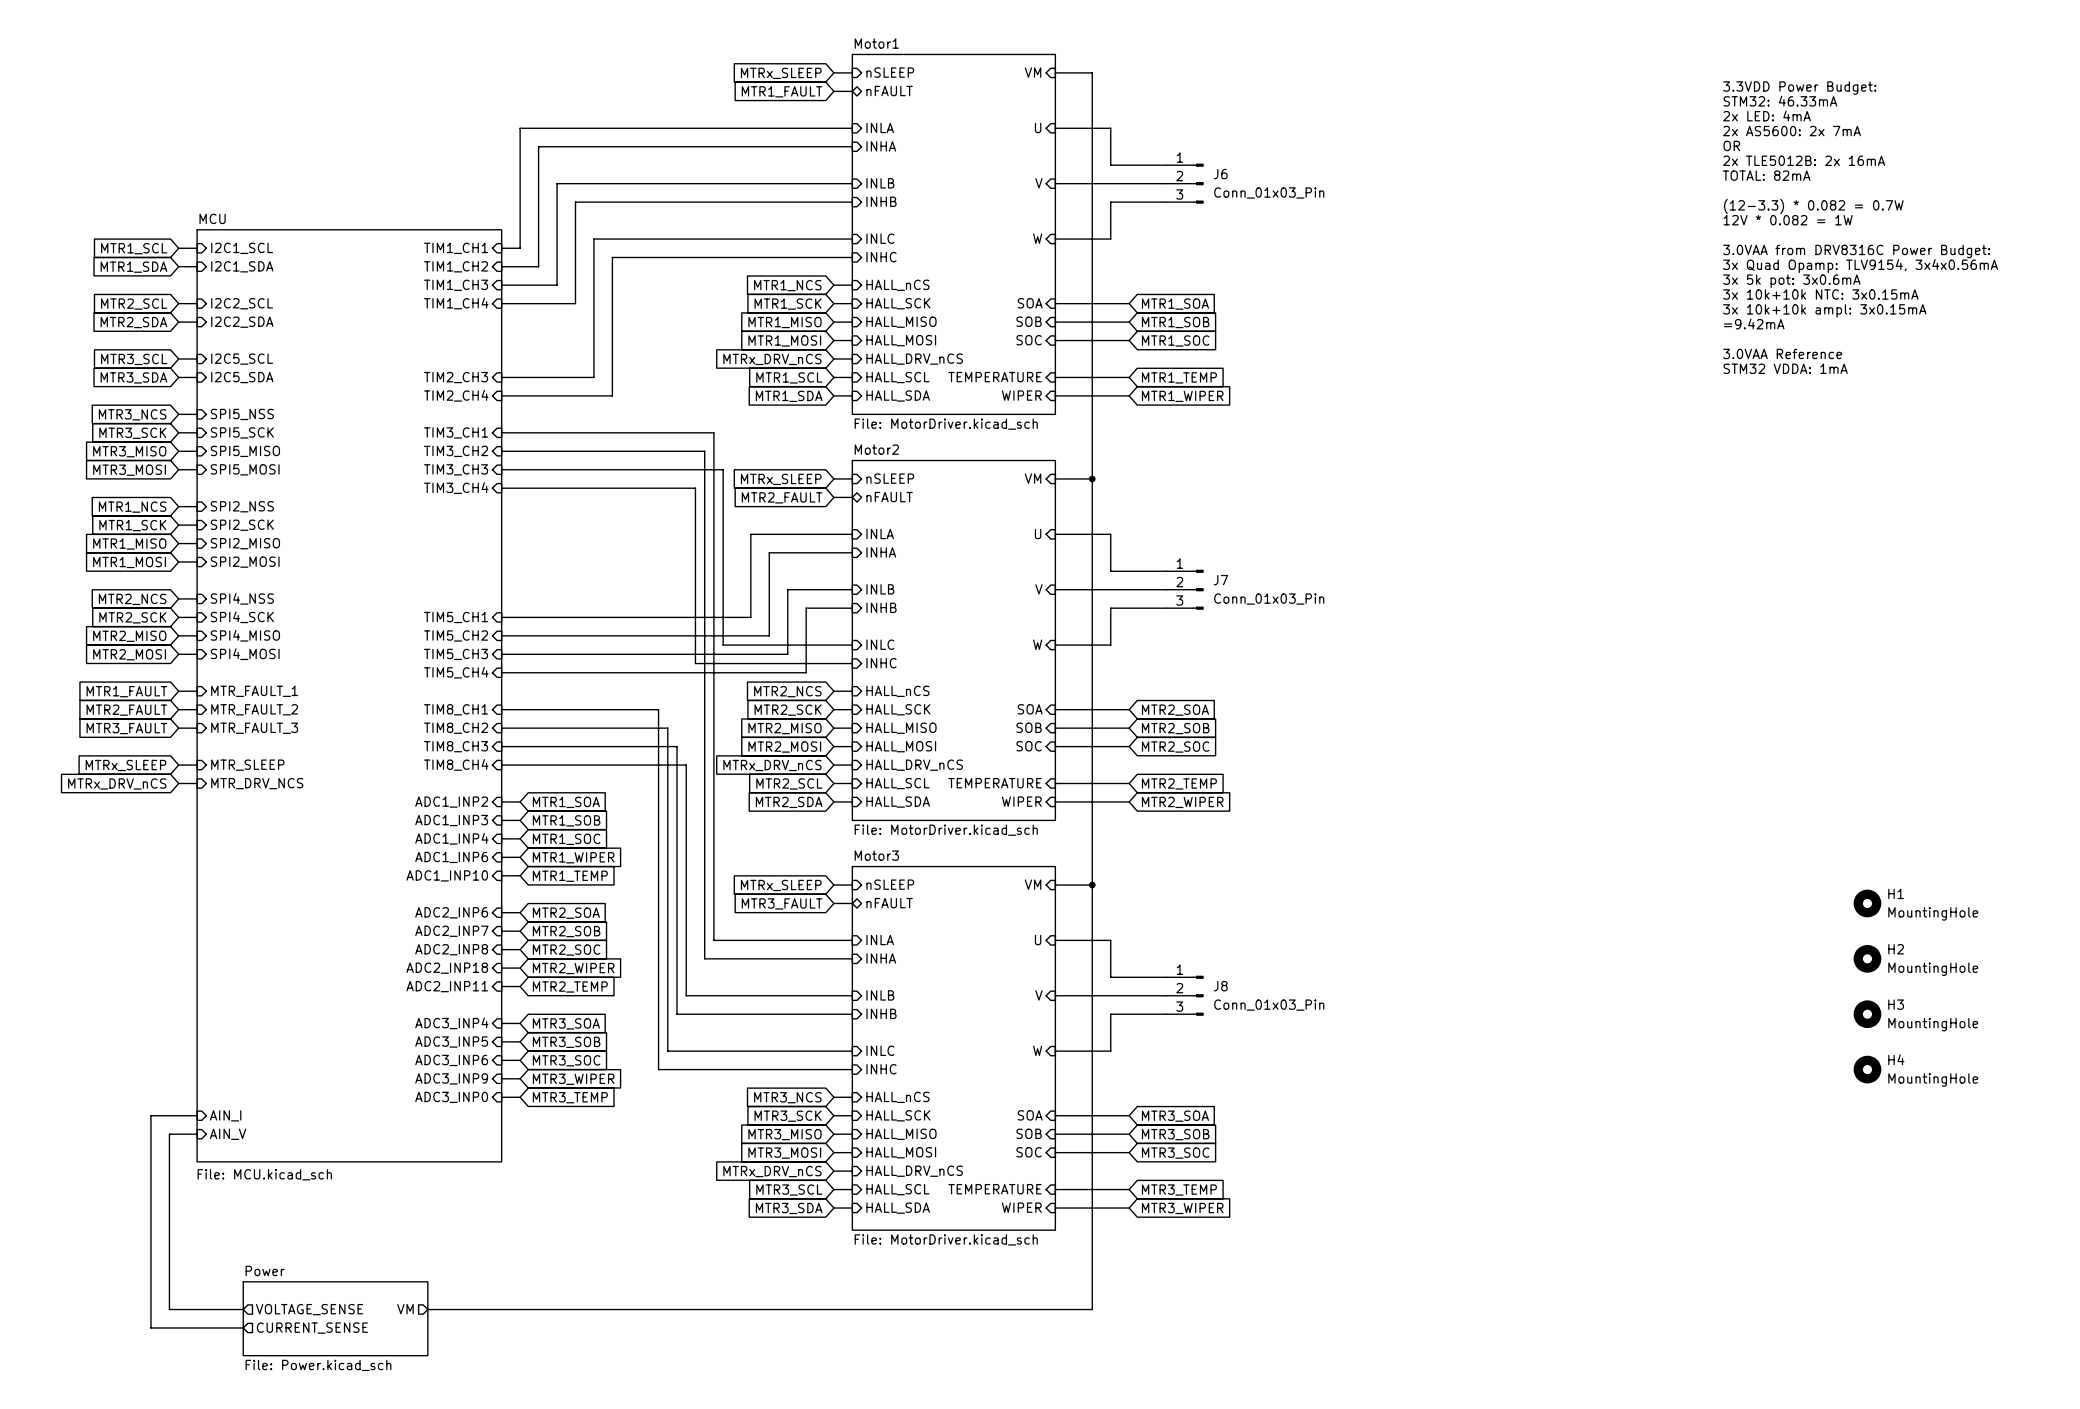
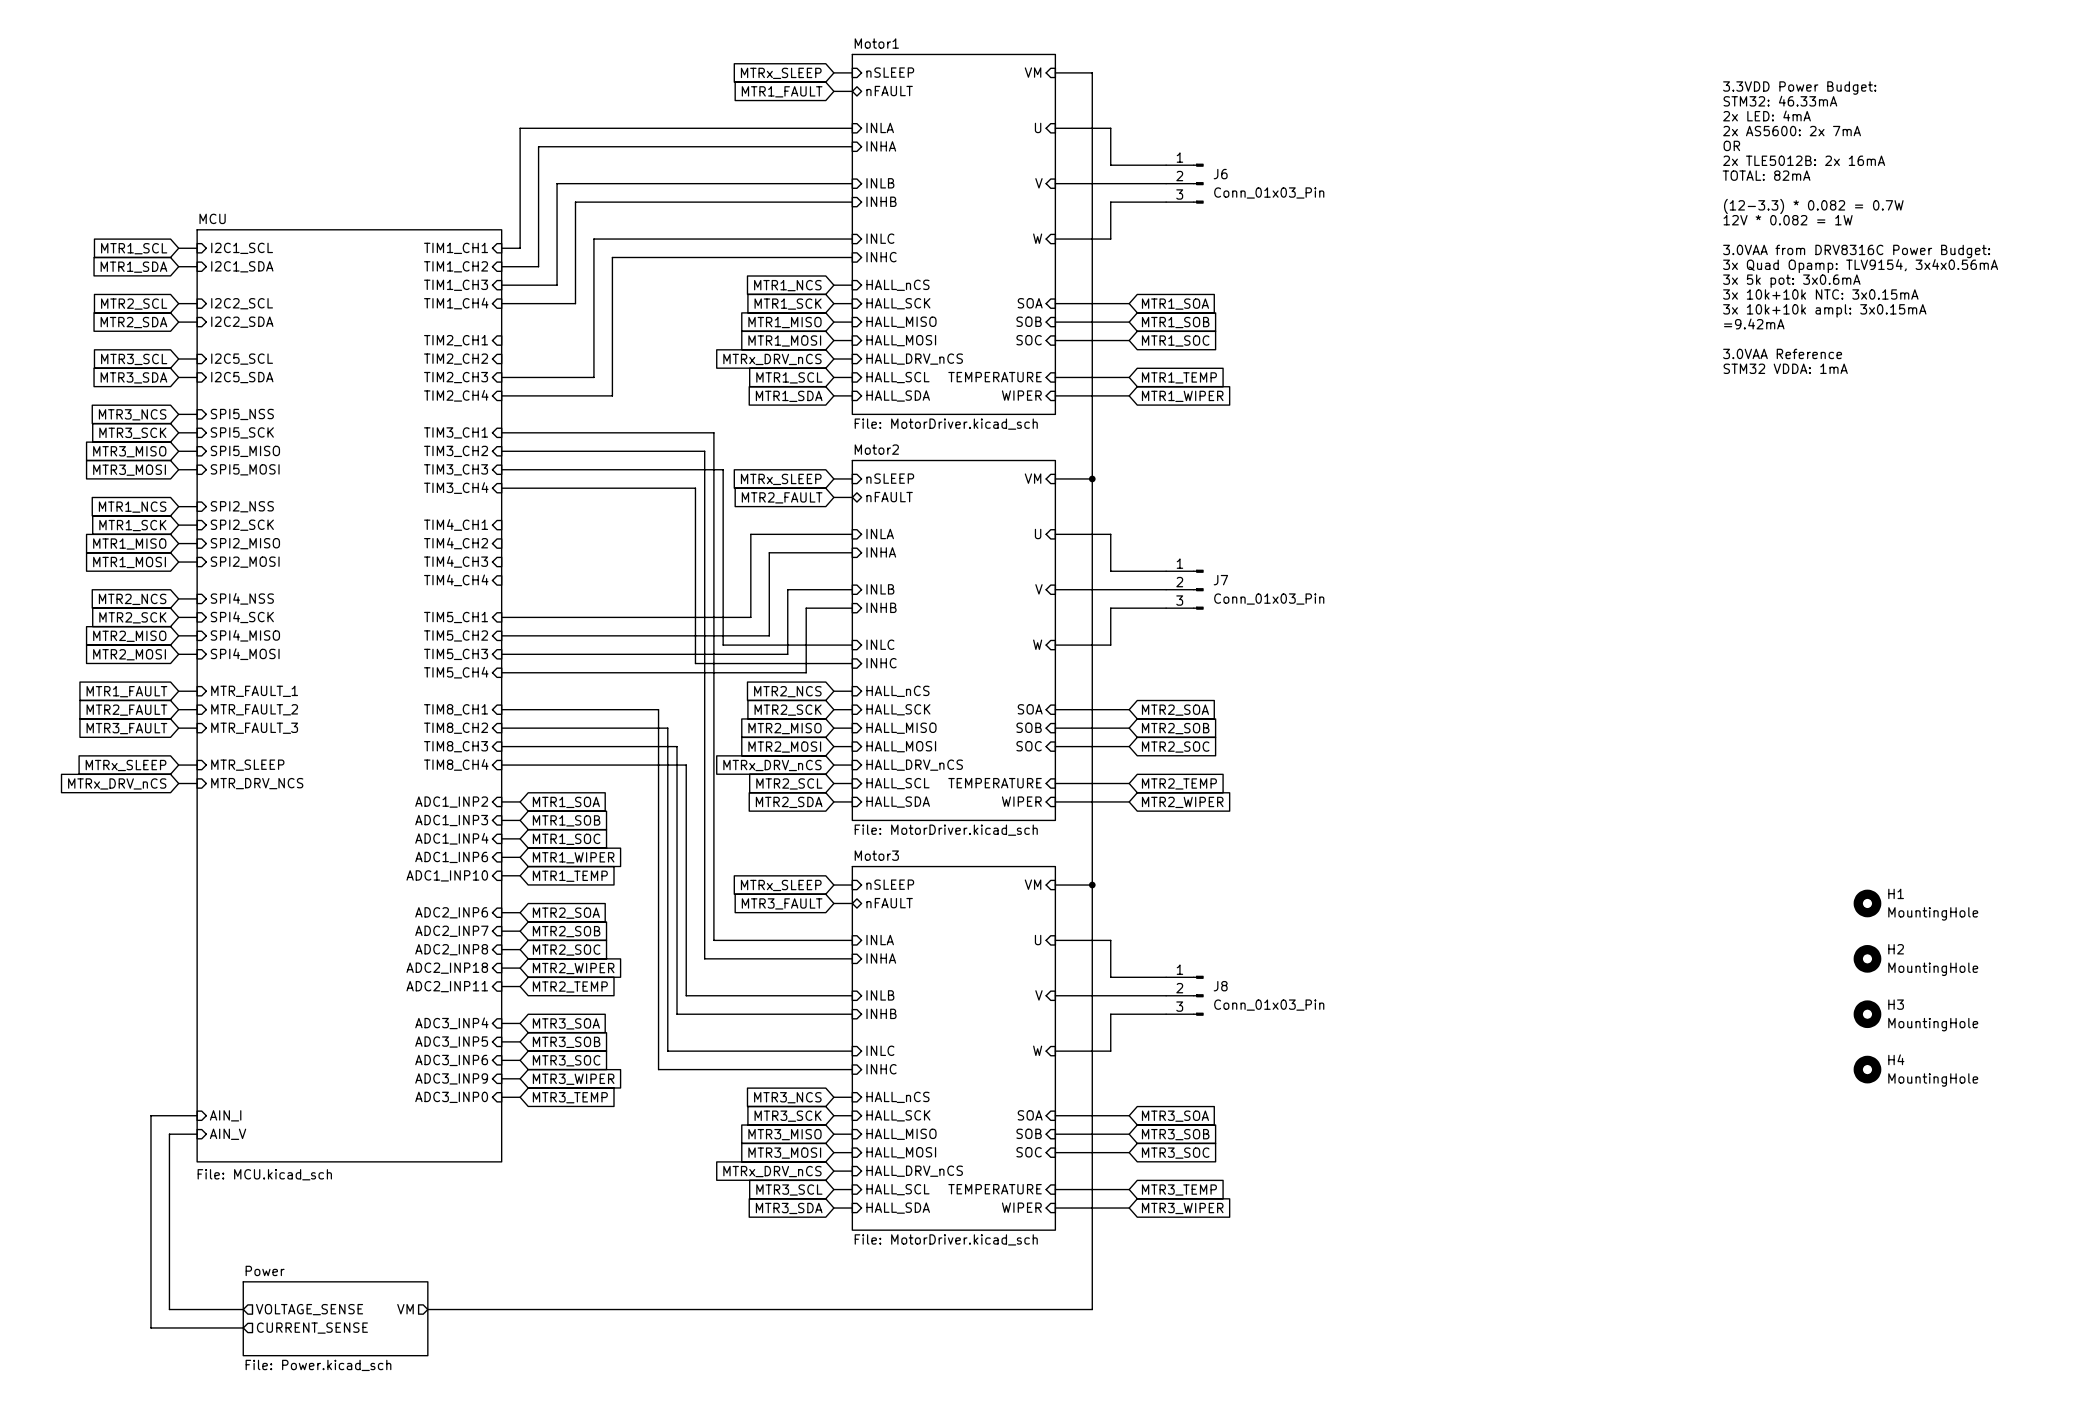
sheet pin: none -> TIM2_CH1 (456, 340)
sheet pin: none -> TIM2_CH2 (456, 359)
sheet pin: none -> TIM4_CH1 (456, 524)
sheet pin: none -> TIM4_CH2 (456, 543)
sheet pin: none -> TIM4_CH3 (456, 561)
sheet pin: none -> TIM4_CH4 (456, 580)

